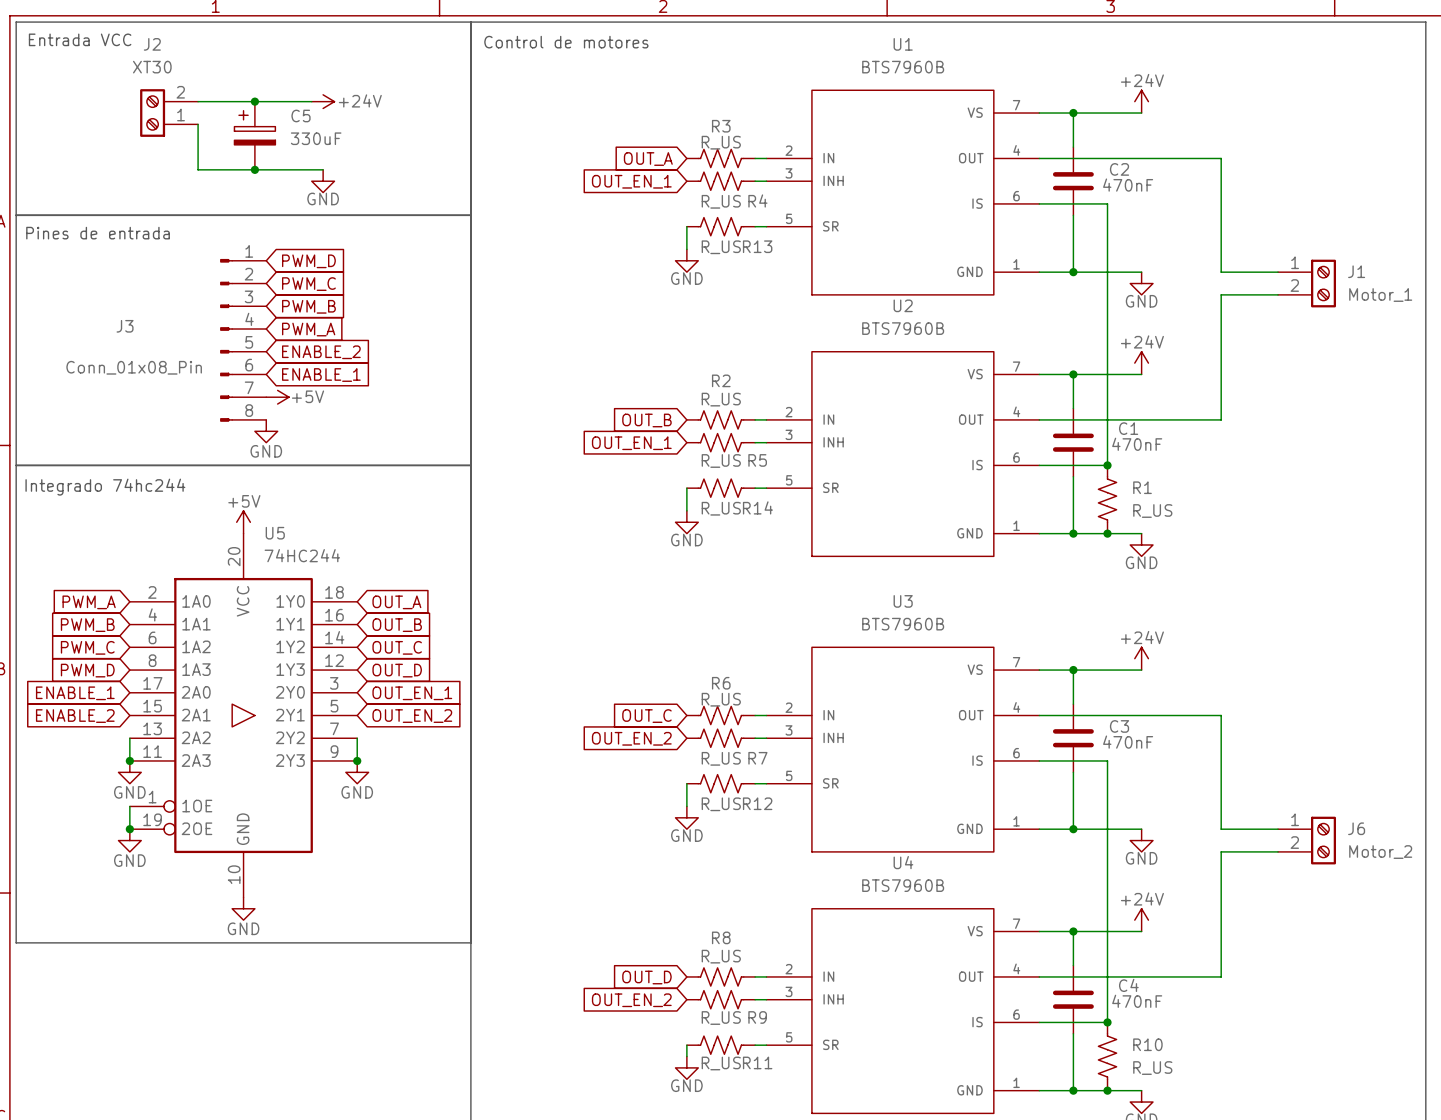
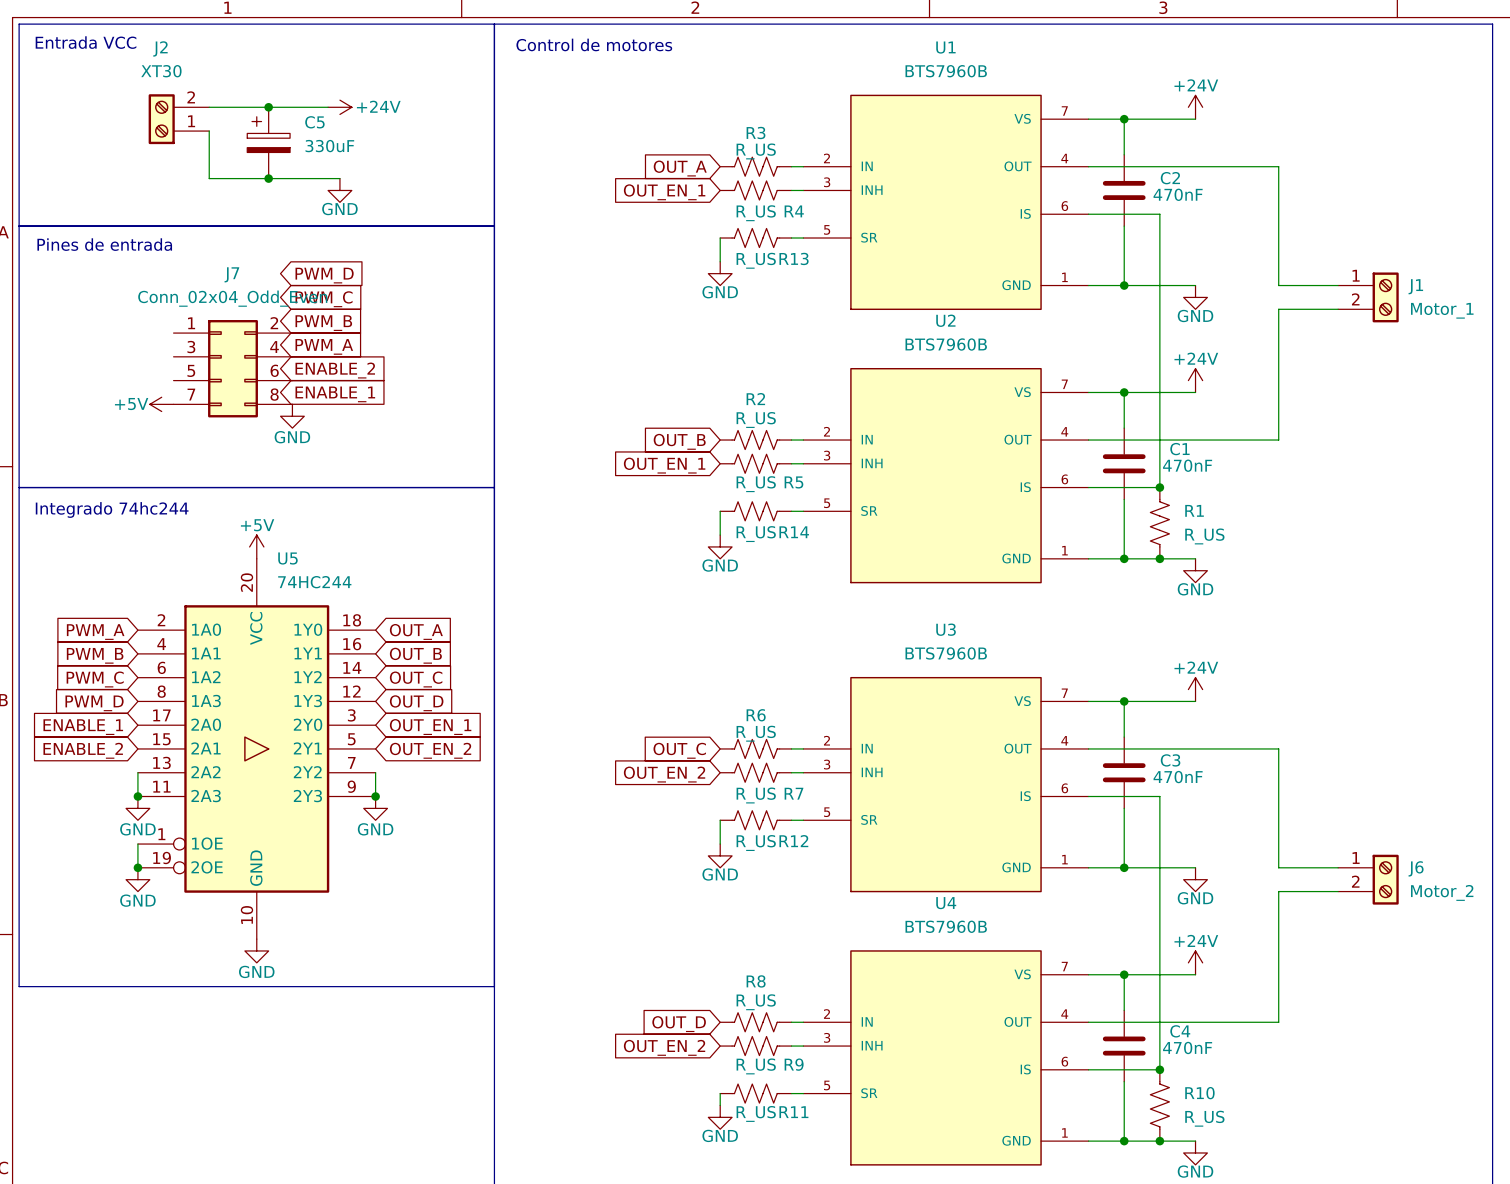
J3: Conn_01x08_Pin (243, 340) -> none
J7: none -> Conn_02x04_Odd_Even (233, 368)
power symbol: none -> +5V (161, 404)
power symbol: +5V (277, 397) -> GND (292, 416)
power symbol: GND (266, 431) -> none

